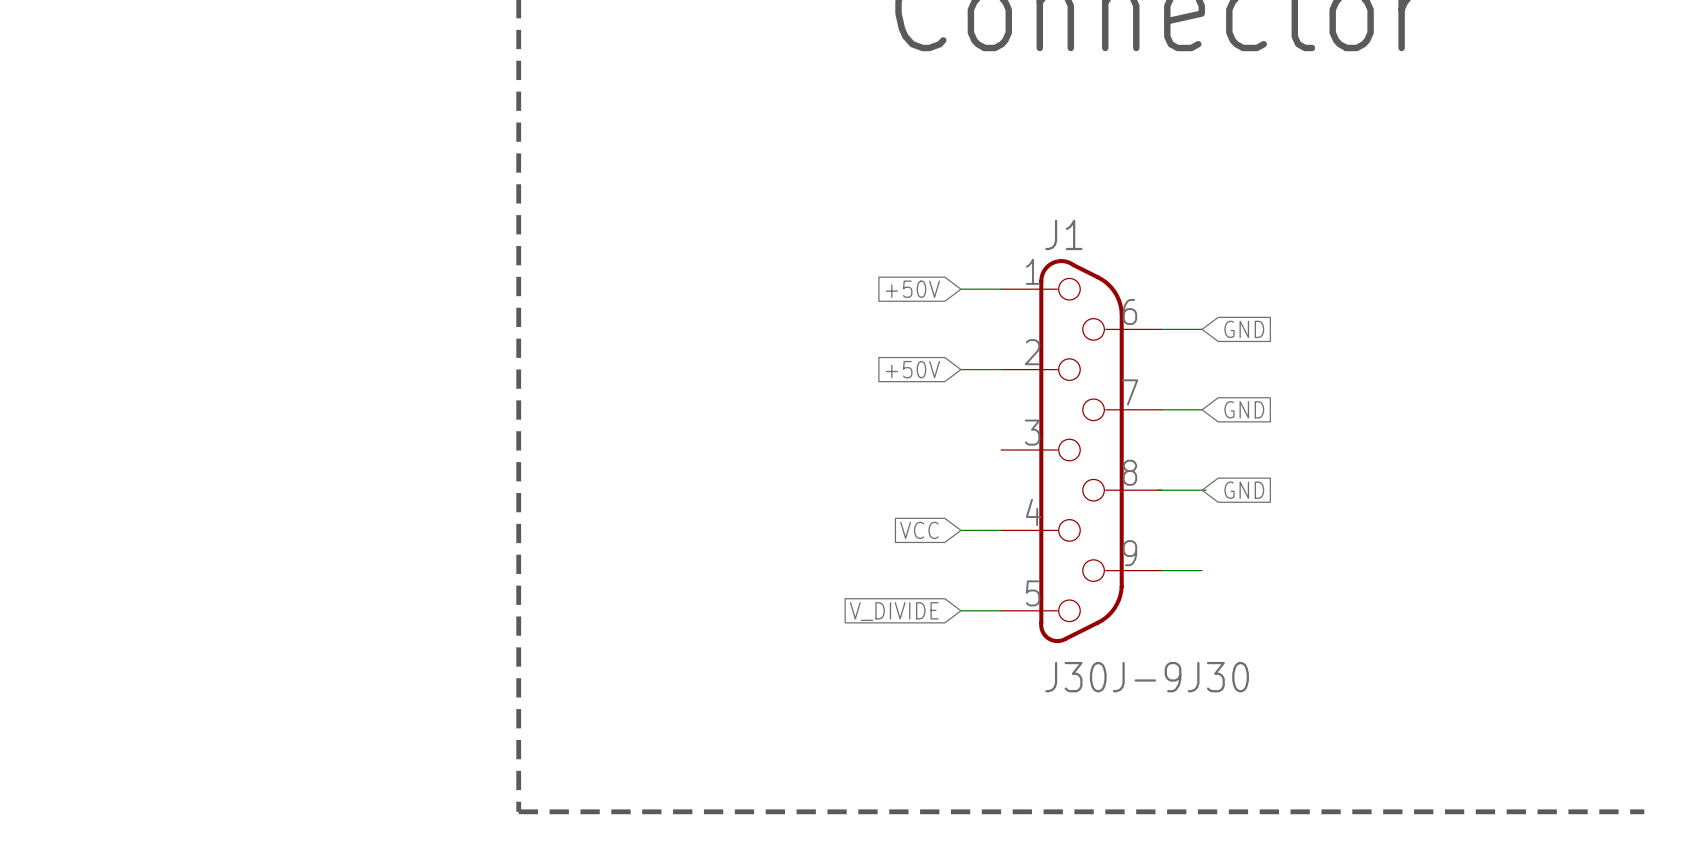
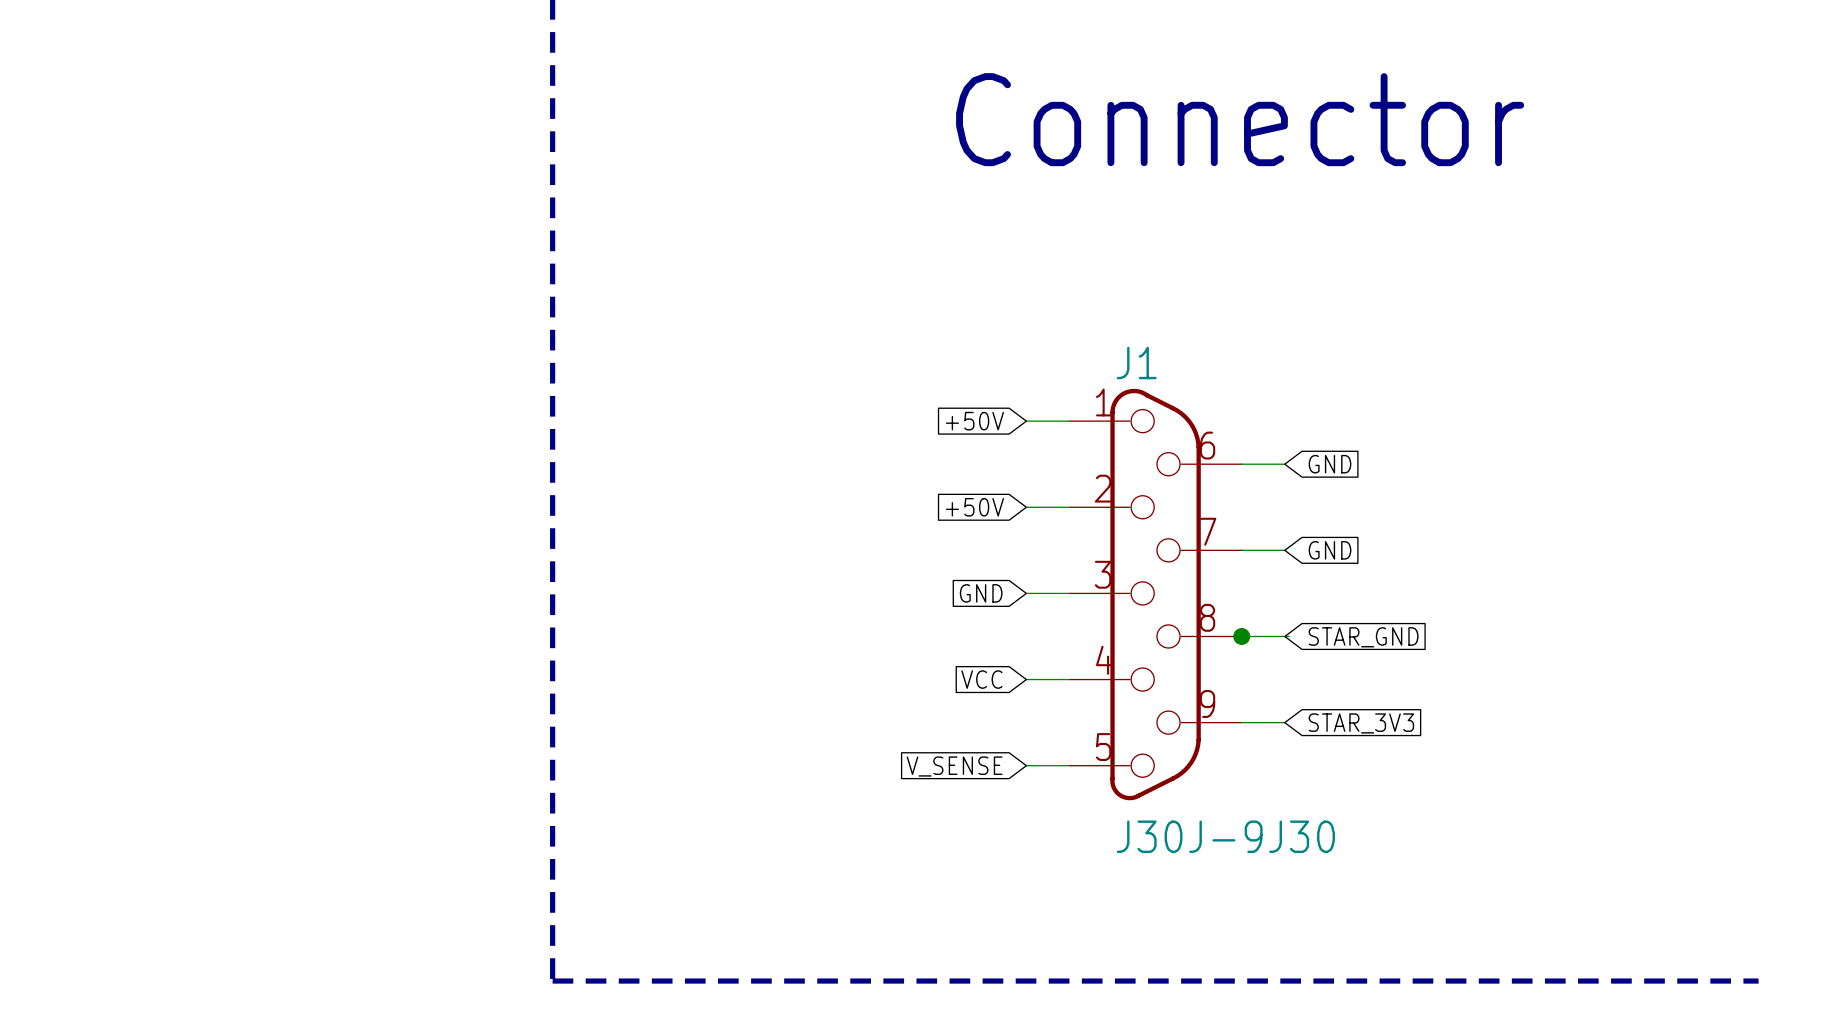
global label: none -> GND (981, 593)
wire: none -> (1026, 593) (1069, 593)
junction: none -> (1241, 636)
global label: GND (1244, 490) -> STAR_GND (1363, 637)
global label: none -> STAR_3V3 (1361, 723)
global label: V_DIVIDE (894, 611) -> V_SENSE (954, 766)

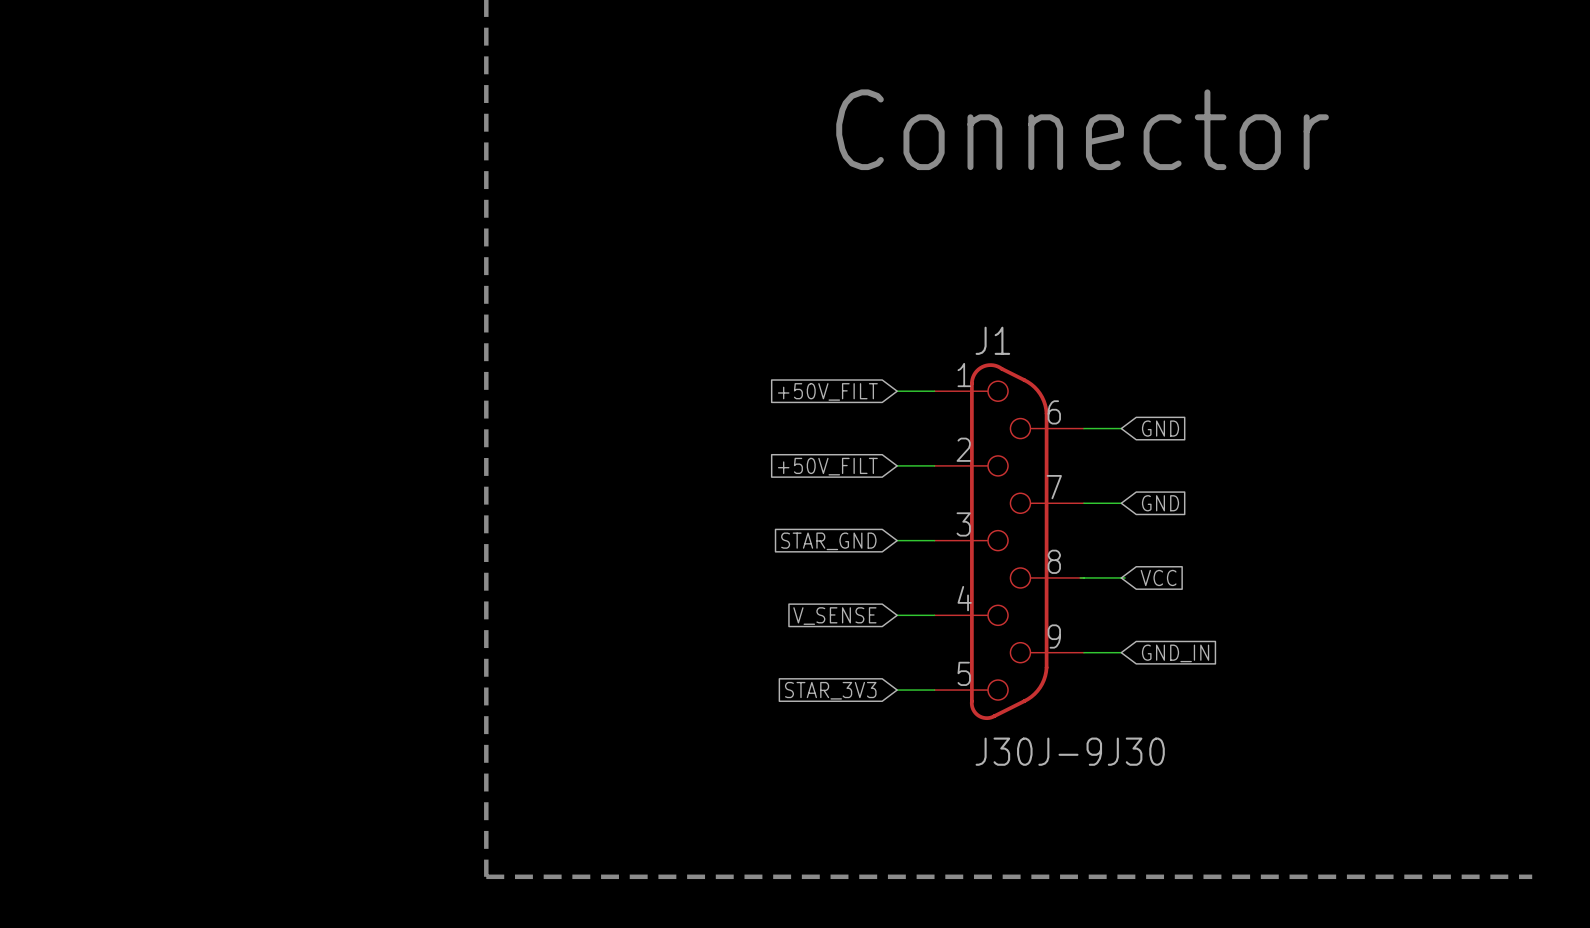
global label: +50V (974, 421) -> +50V_FILT (827, 391)
global label: +50V (974, 507) -> +50V_FILT (827, 466)
global label: GND (981, 593) -> STAR_GND (828, 541)
junction: (1241, 636) -> none
global label: STAR_GND (1363, 637) -> VCC (1158, 577)
global label: VCC (981, 679) -> V_SENSE (834, 616)
global label: STAR_3V3 (1361, 723) -> GND_IN (1175, 653)
global label: V_SENSE (954, 766) -> STAR_3V3 (830, 690)

